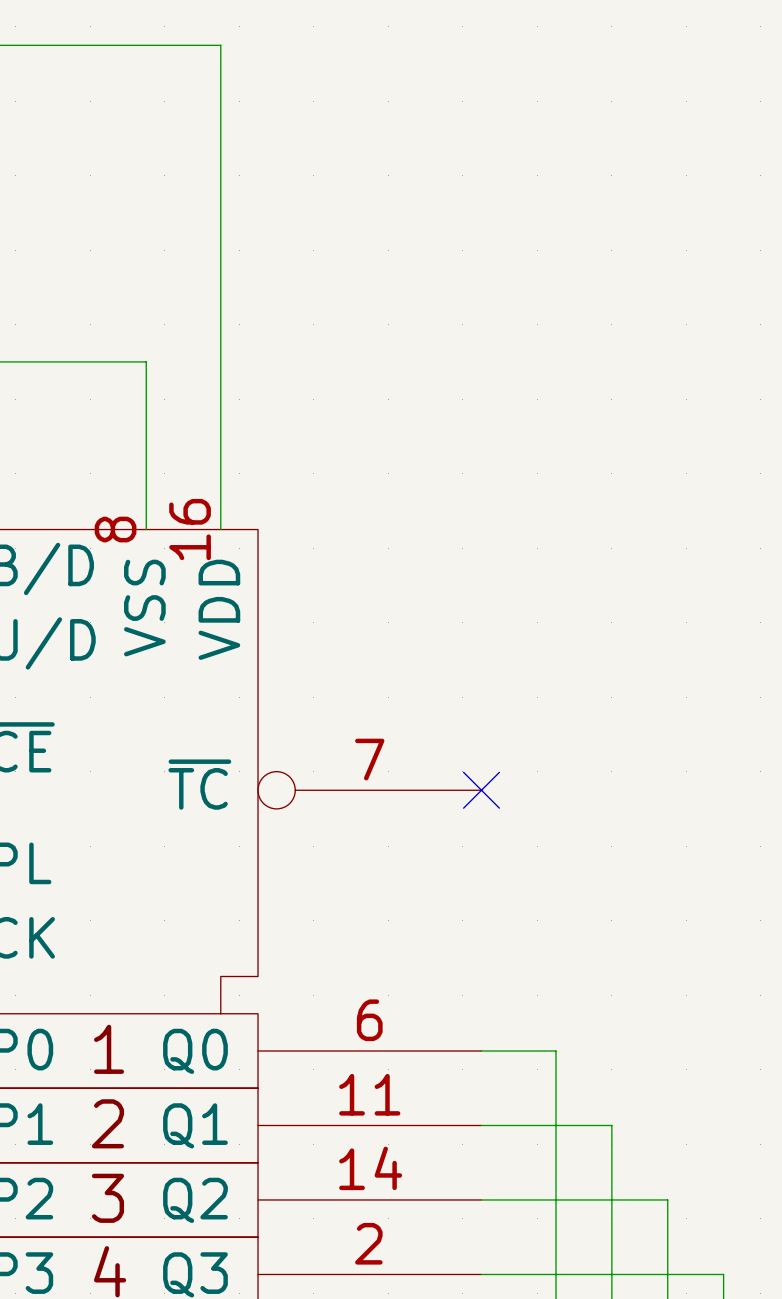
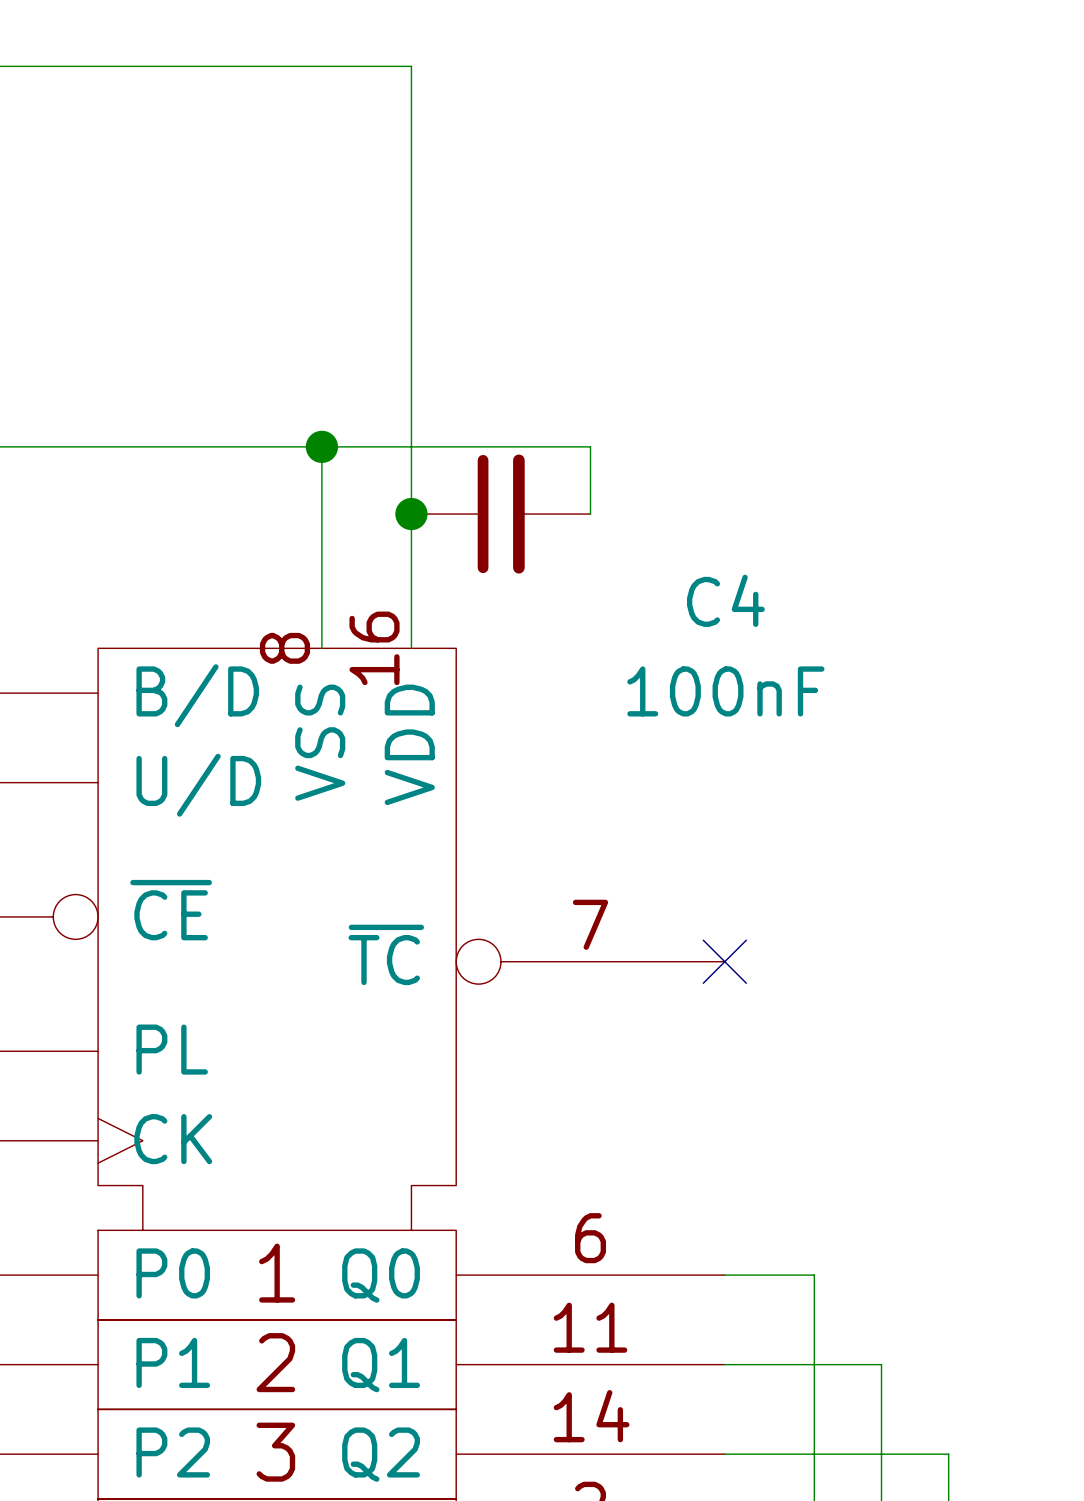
wire: none -> (321, 446) (590, 446) (590, 514)
junction: none -> (321, 446)
junction: none -> (411, 514)
C4: none -> 100nF (500, 514)

